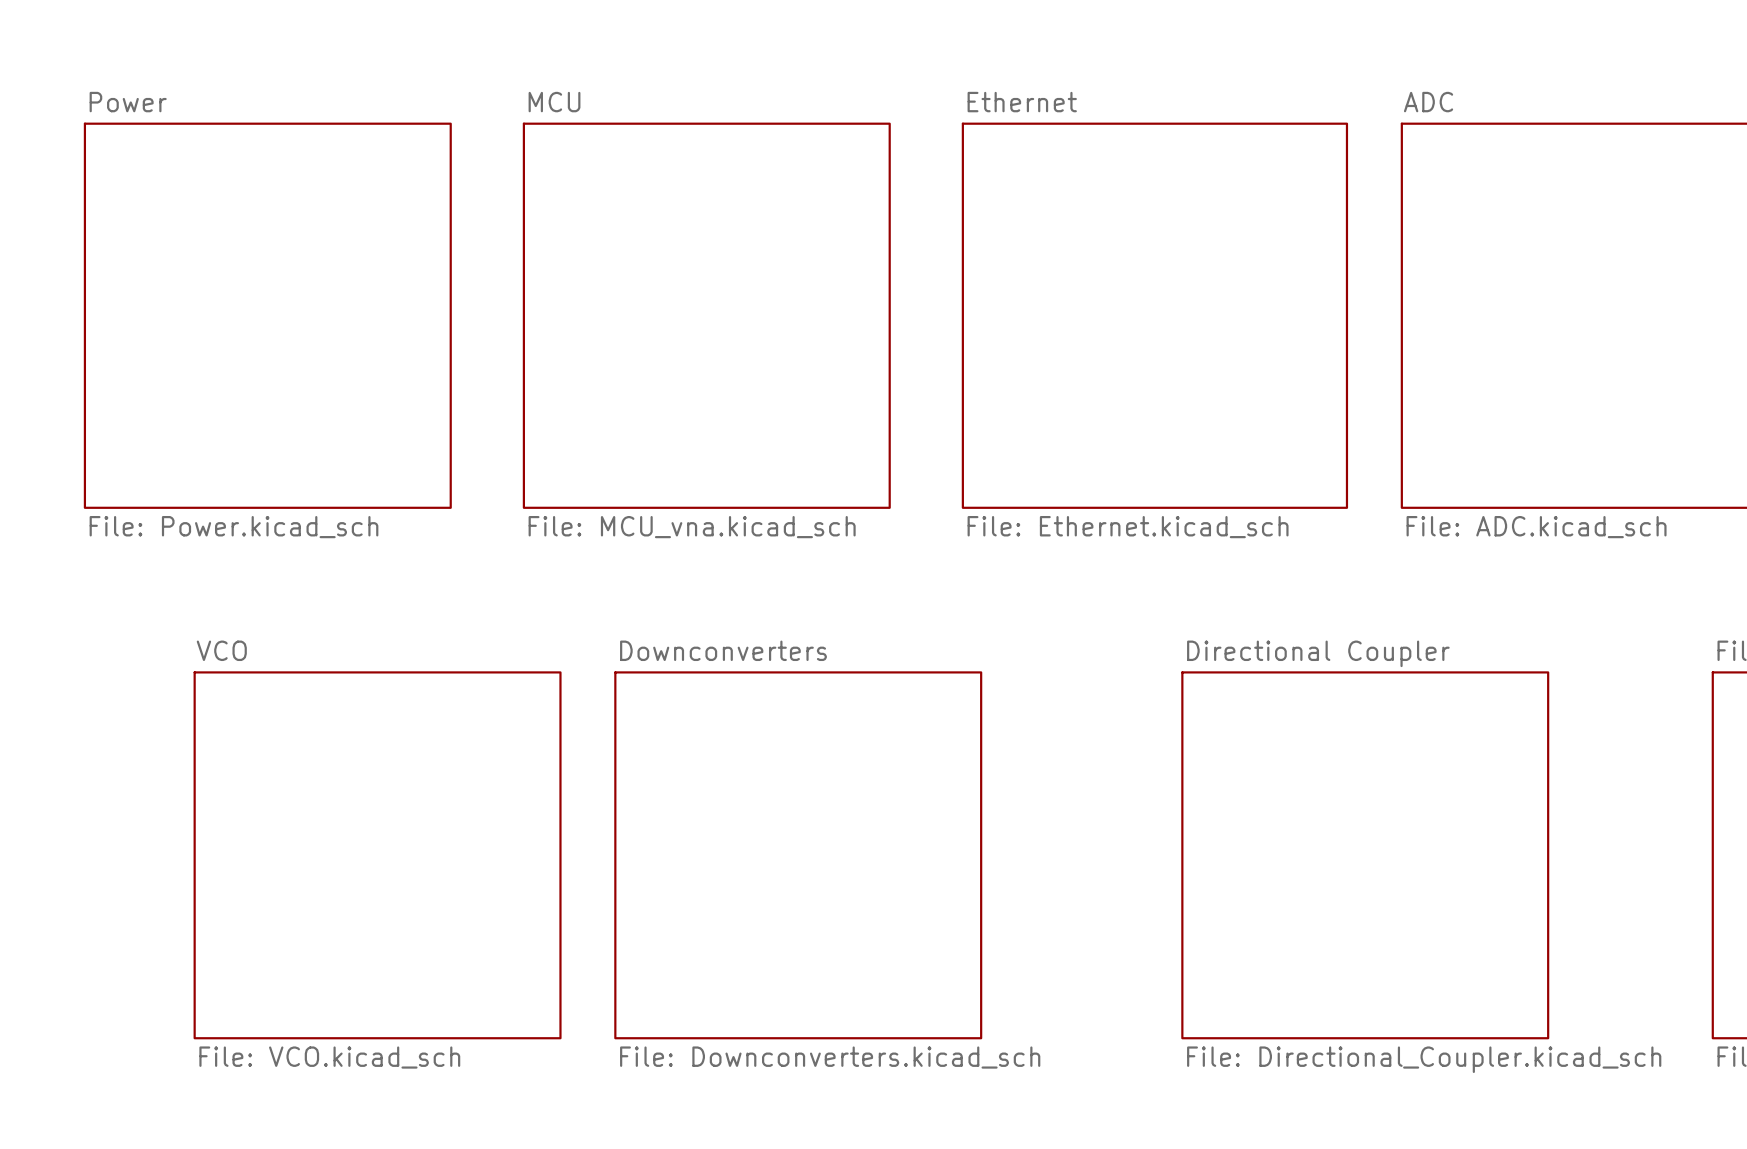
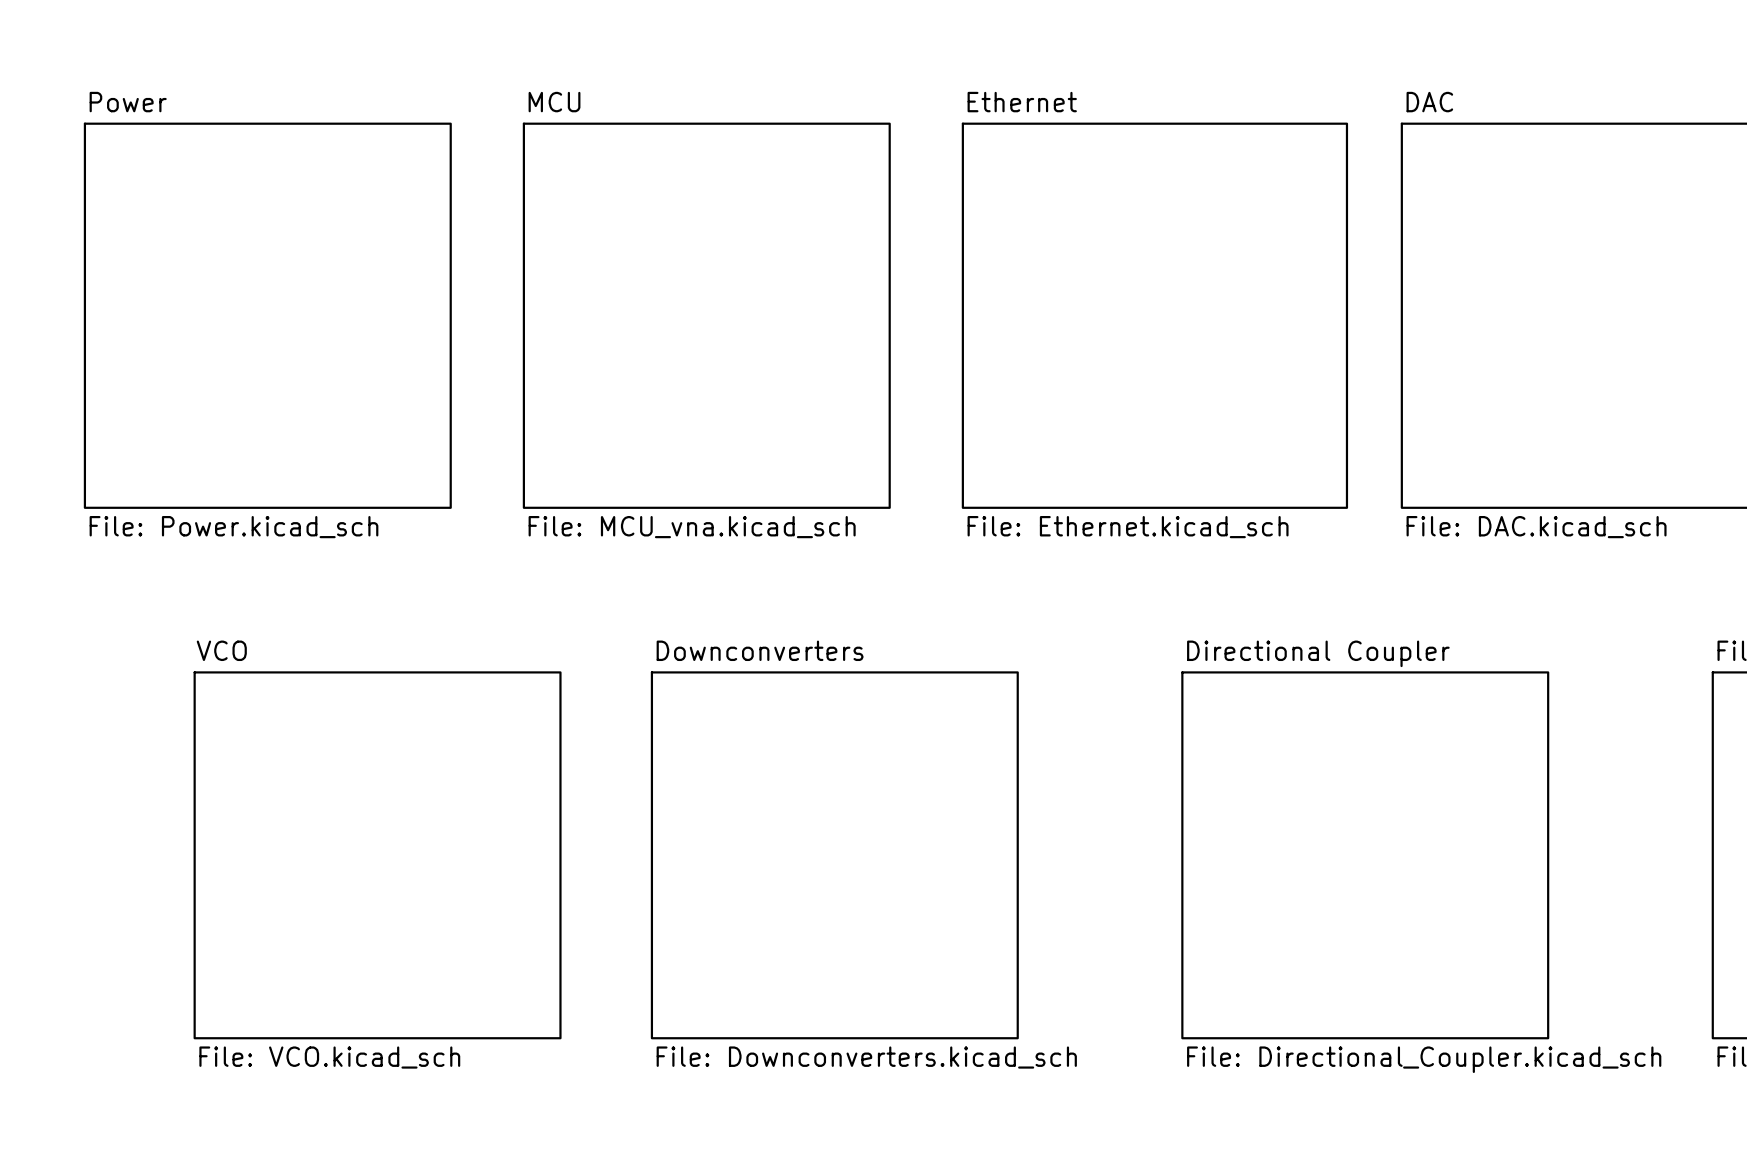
sheet ADC name: ADC (1428, 102) -> DAC (1429, 102)
sheet ADC value: File: ADC.kicad_sch (1536, 527) -> File: DAC.kicad_sch (1536, 527)
sheet Downconverters position: (798, 855) -> (834, 855)

